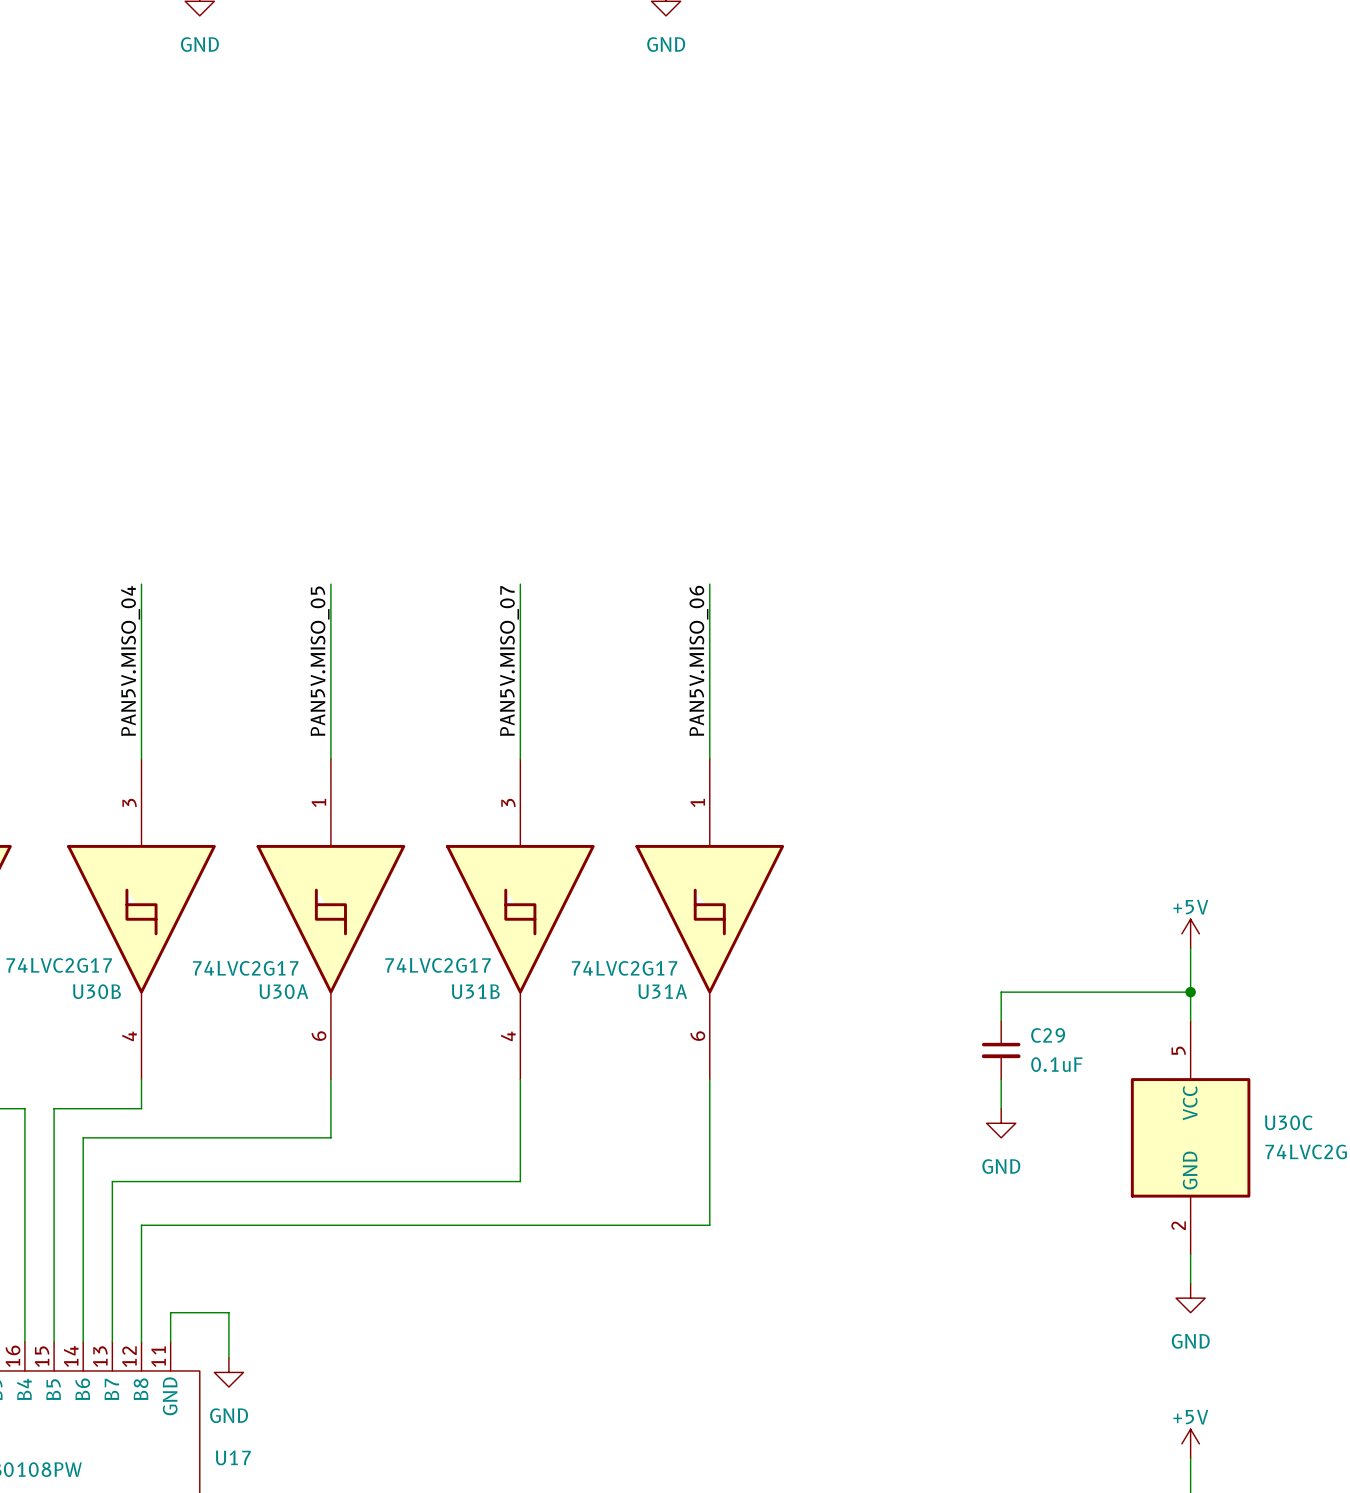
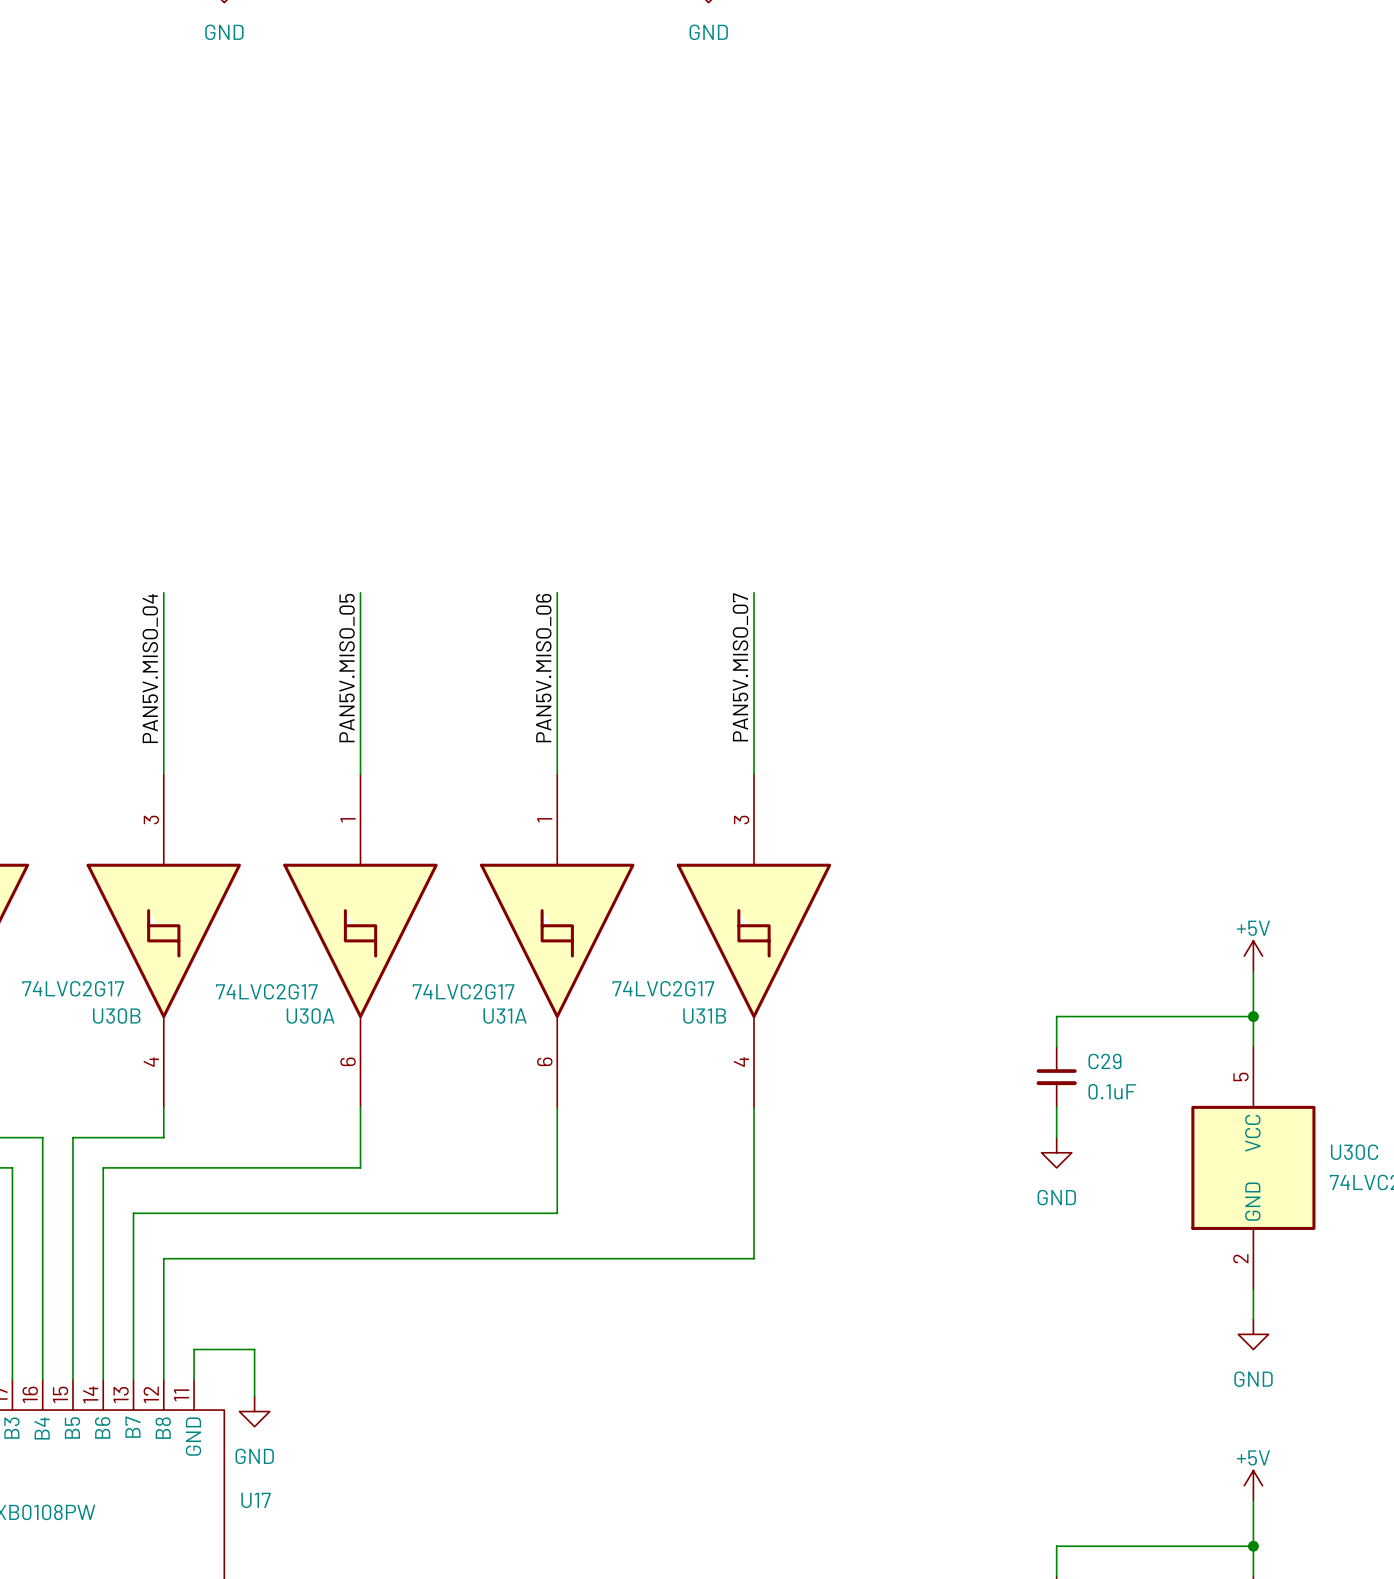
label: PAN5V.MISO_06 (698, 660) -> PAN5V.MISO_07 (740, 667)
label: PAN5V.MISO_07 (509, 661) -> PAN5V.MISO_06 (543, 668)
U31B position: (520, 919) -> (753, 940)
U31A position: (709, 919) -> (557, 940)

